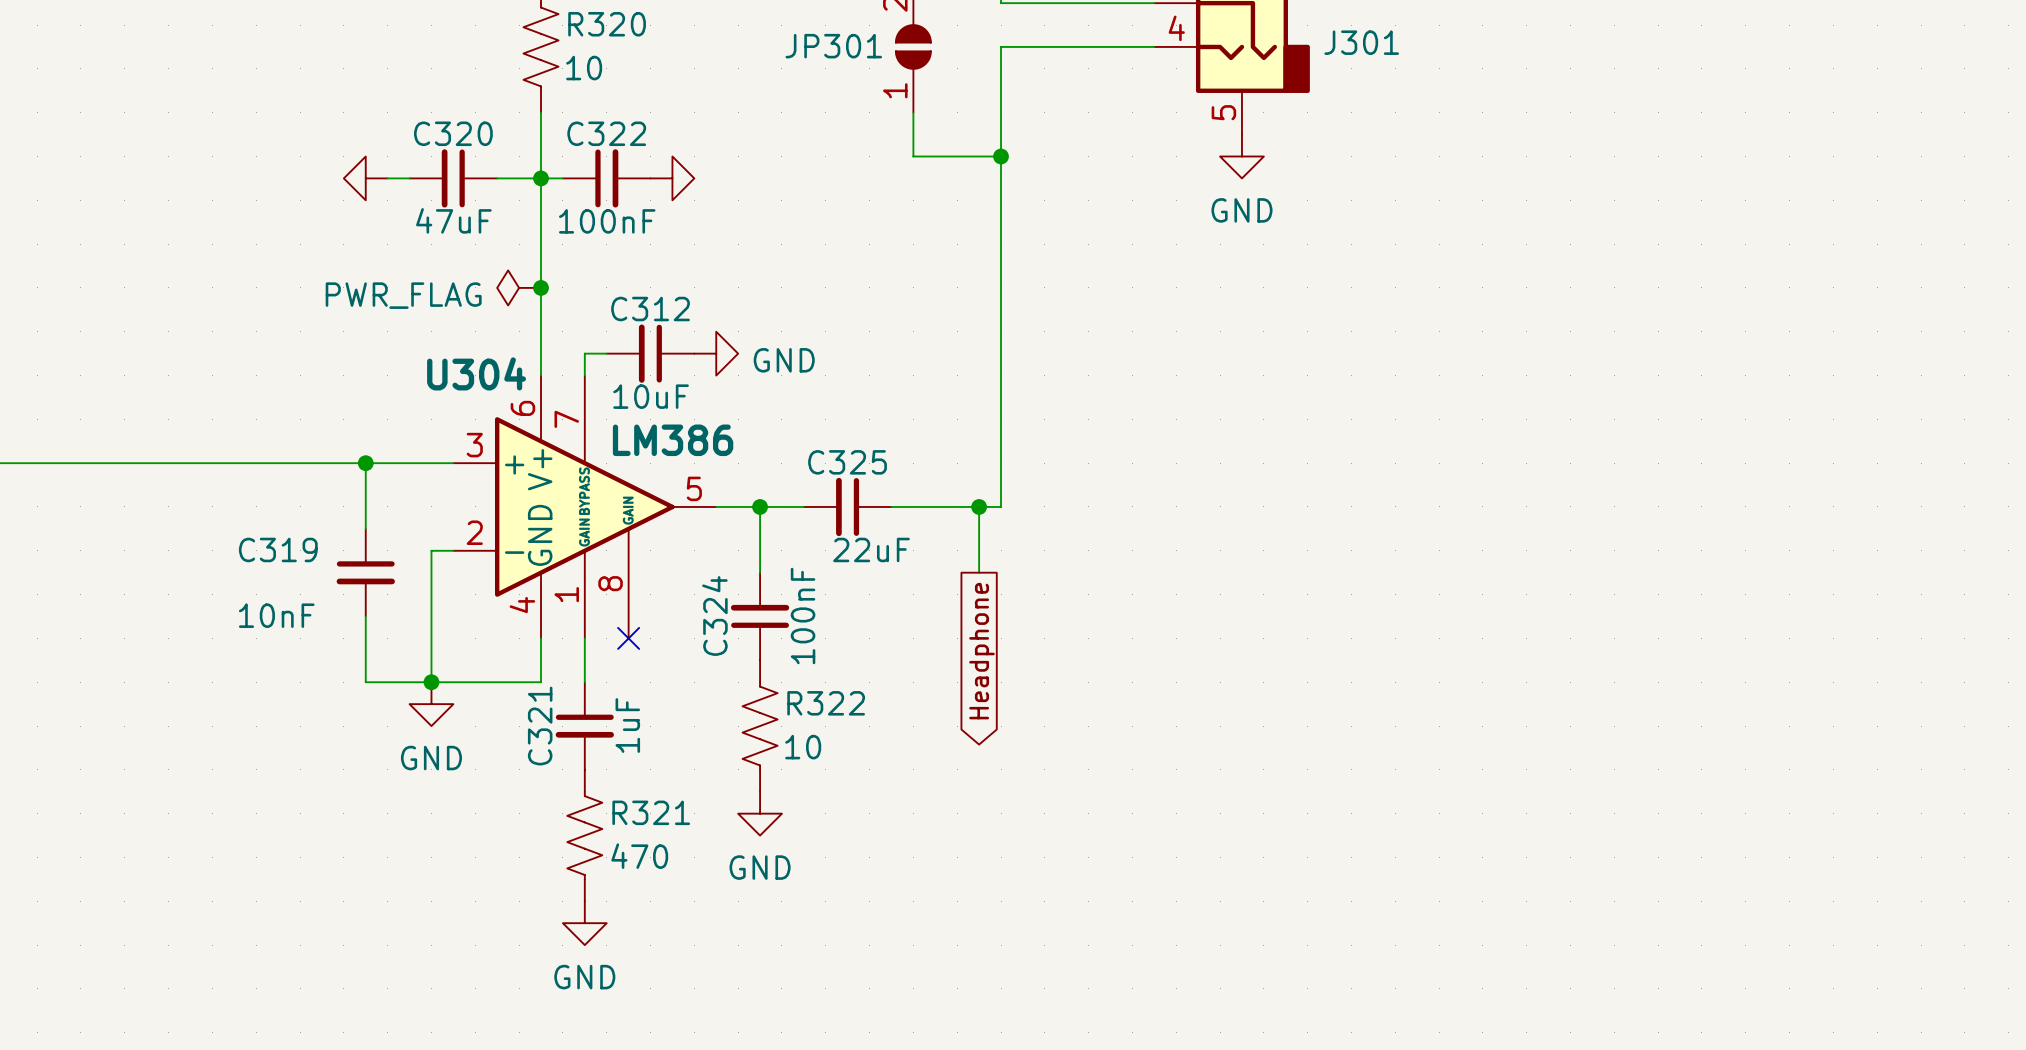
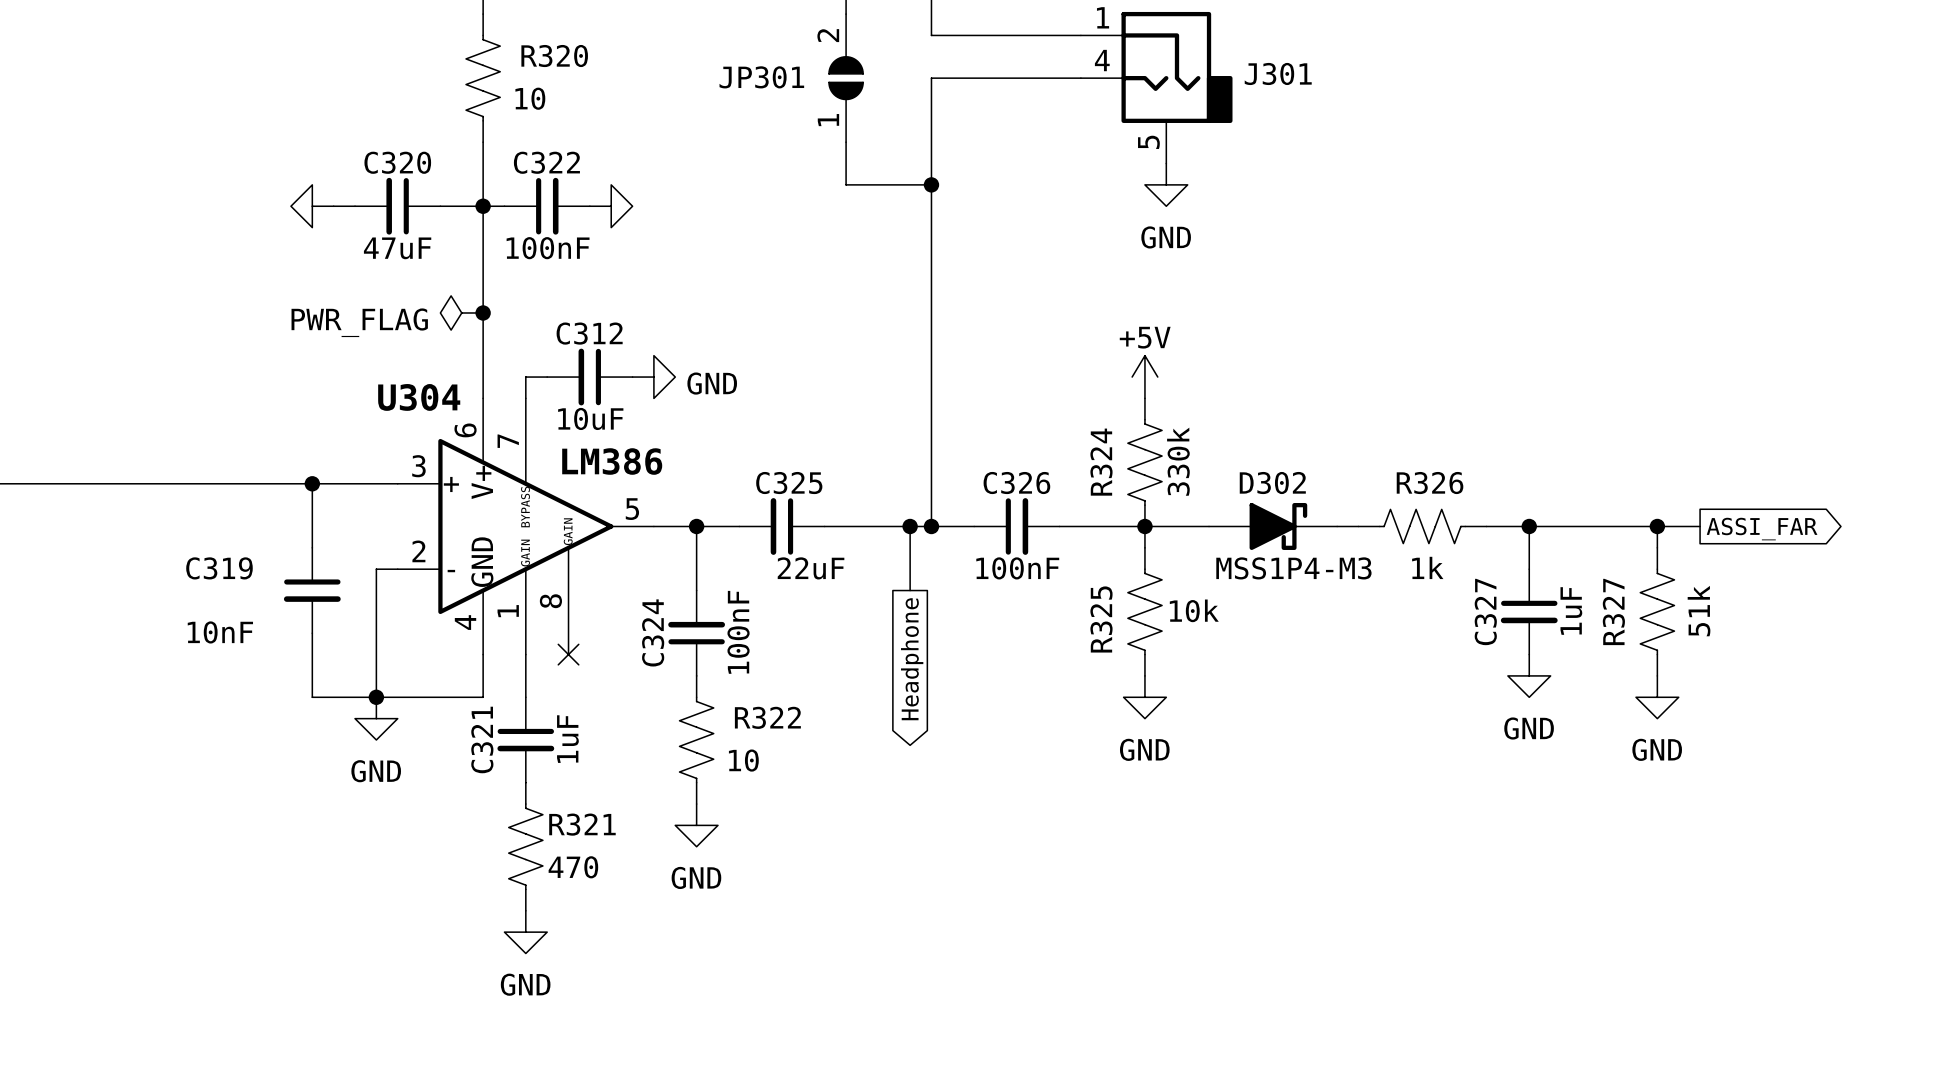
power symbol: none -> +5V (1144, 377)
R324: none -> 330k (1144, 462)
wire: none -> (931, 526) (974, 526)
junction: none -> (931, 526)
C326: none -> 100nF (1016, 526)
wire: none -> (1059, 526) (1209, 526)
wire: none -> (1144, 526) (1144, 547)
junction: none -> (1144, 526)
D302: none -> MSS1P4-M3 (1273, 526)
wire: none -> (1337, 526) (1358, 526)
R326: none -> 1k (1422, 526)
wire: none -> (1486, 526) (1700, 526)
wire: none -> (1529, 526) (1529, 569)
junction: none -> (1529, 526)
wire: none -> (1657, 526) (1657, 547)
junction: none -> (1657, 526)
global label: none -> ASSI_FAR (1762, 529)
R325: none -> 10k (1144, 611)
C327: none -> 1uF (1529, 611)
R327: none -> 51k (1657, 611)
power symbol: none -> GND (1529, 675)
power symbol: none -> GND (1144, 697)
power symbol: none -> GND (1657, 697)

